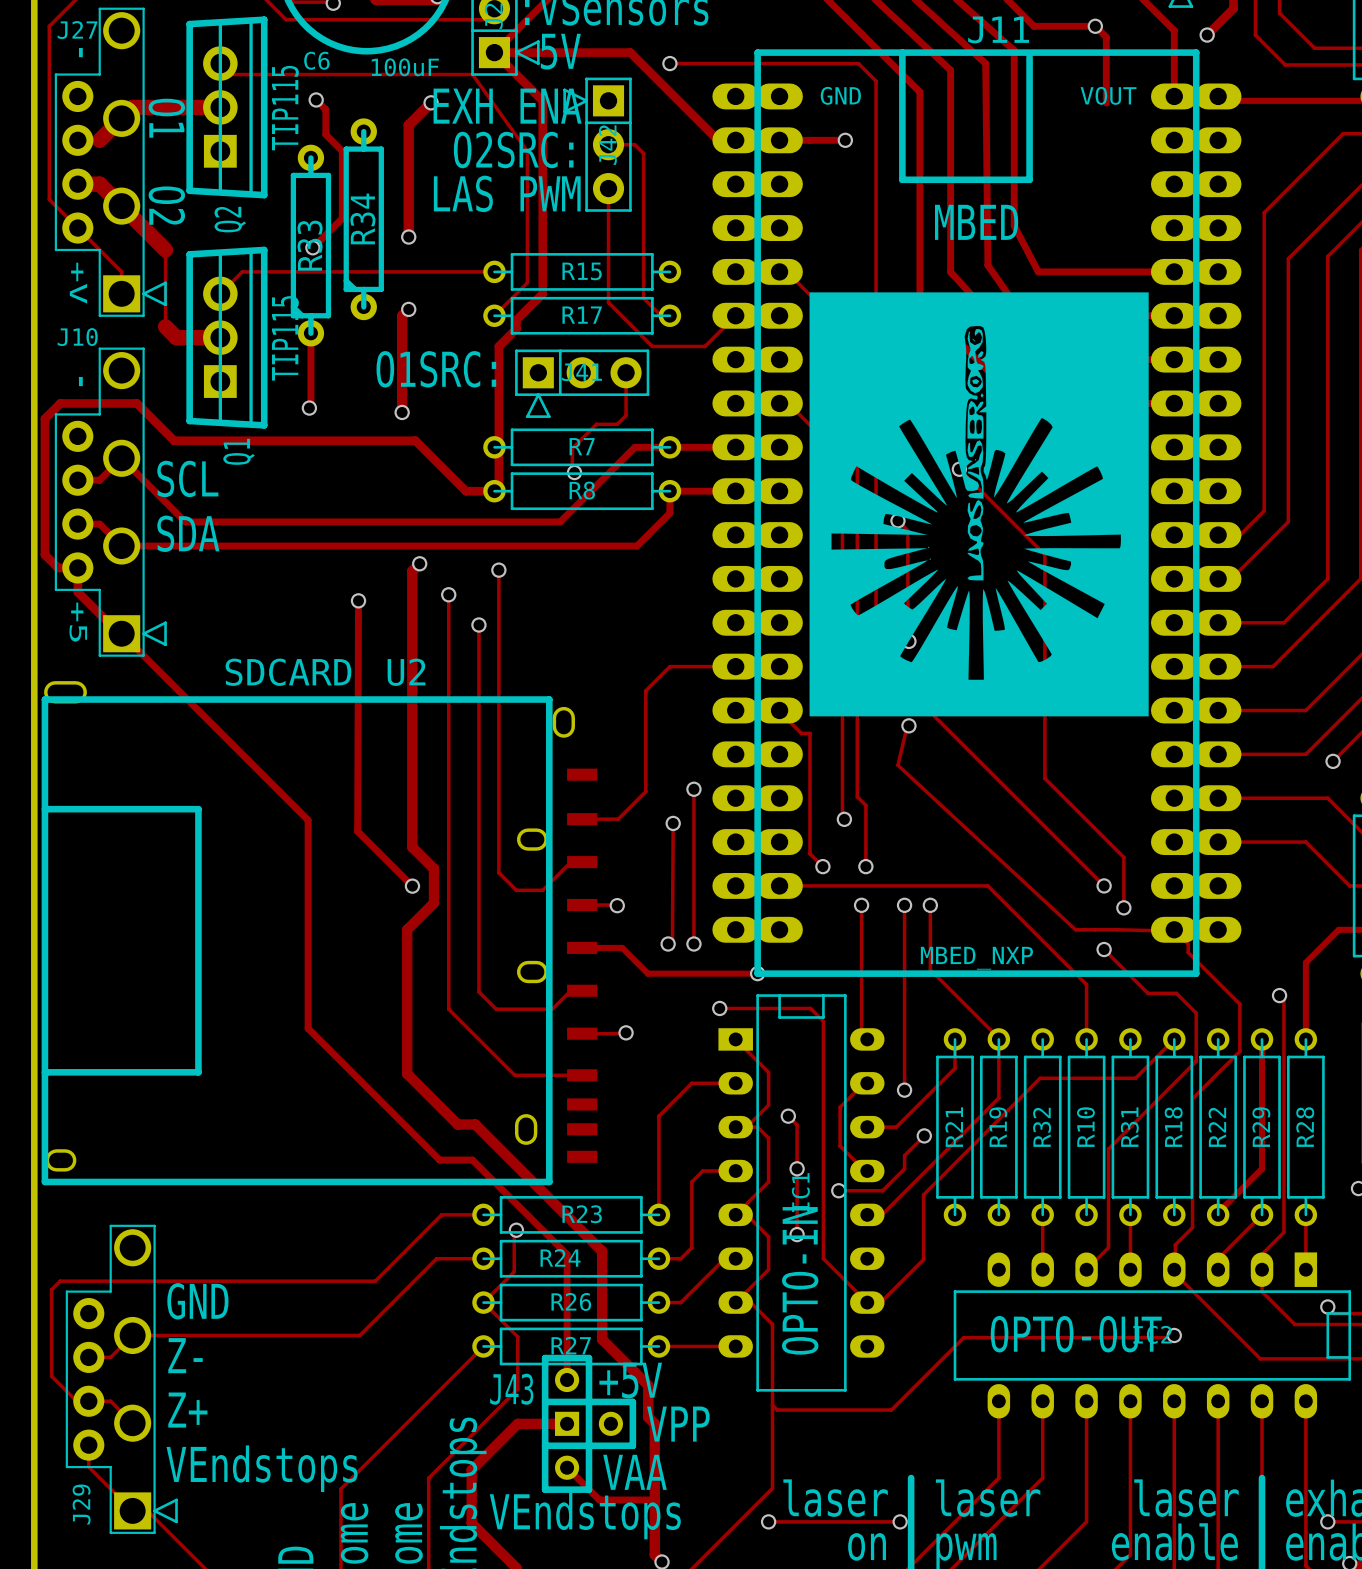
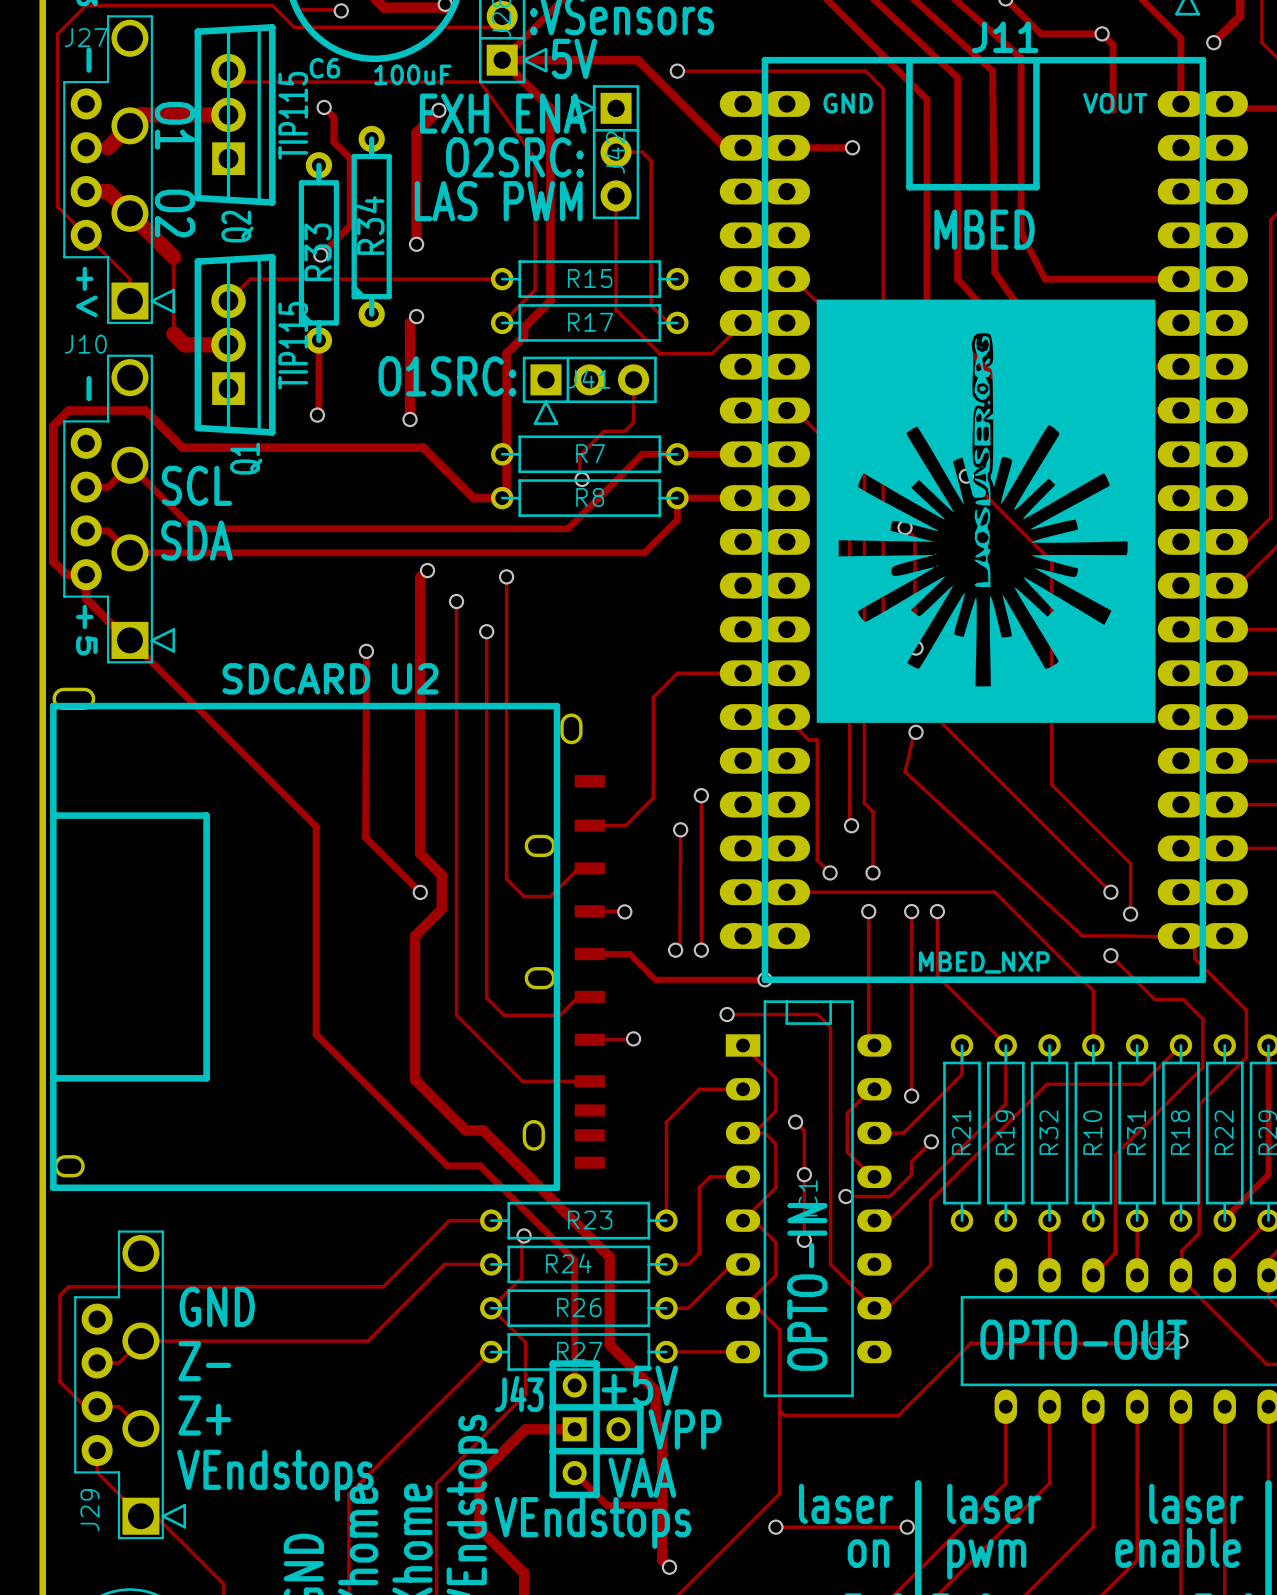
track: (358, 600) (357, 831) -> (366, 651) (365, 837)
via position: (358, 600) -> (366, 651)

